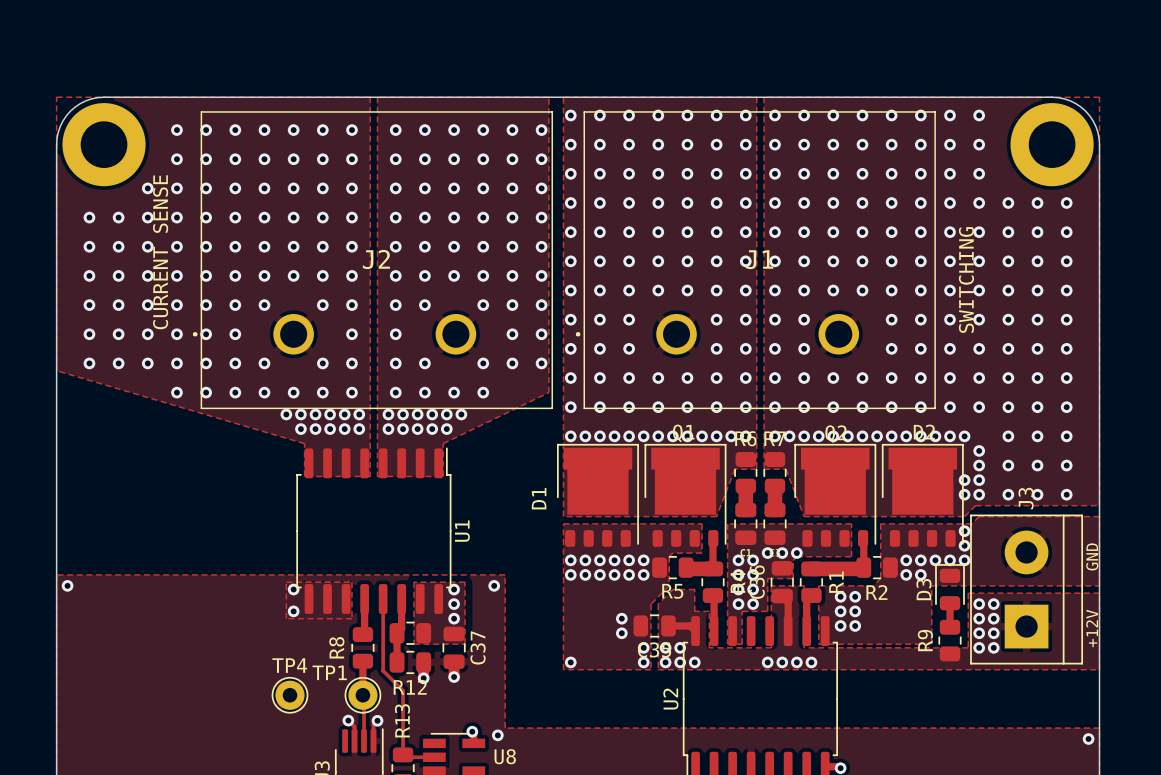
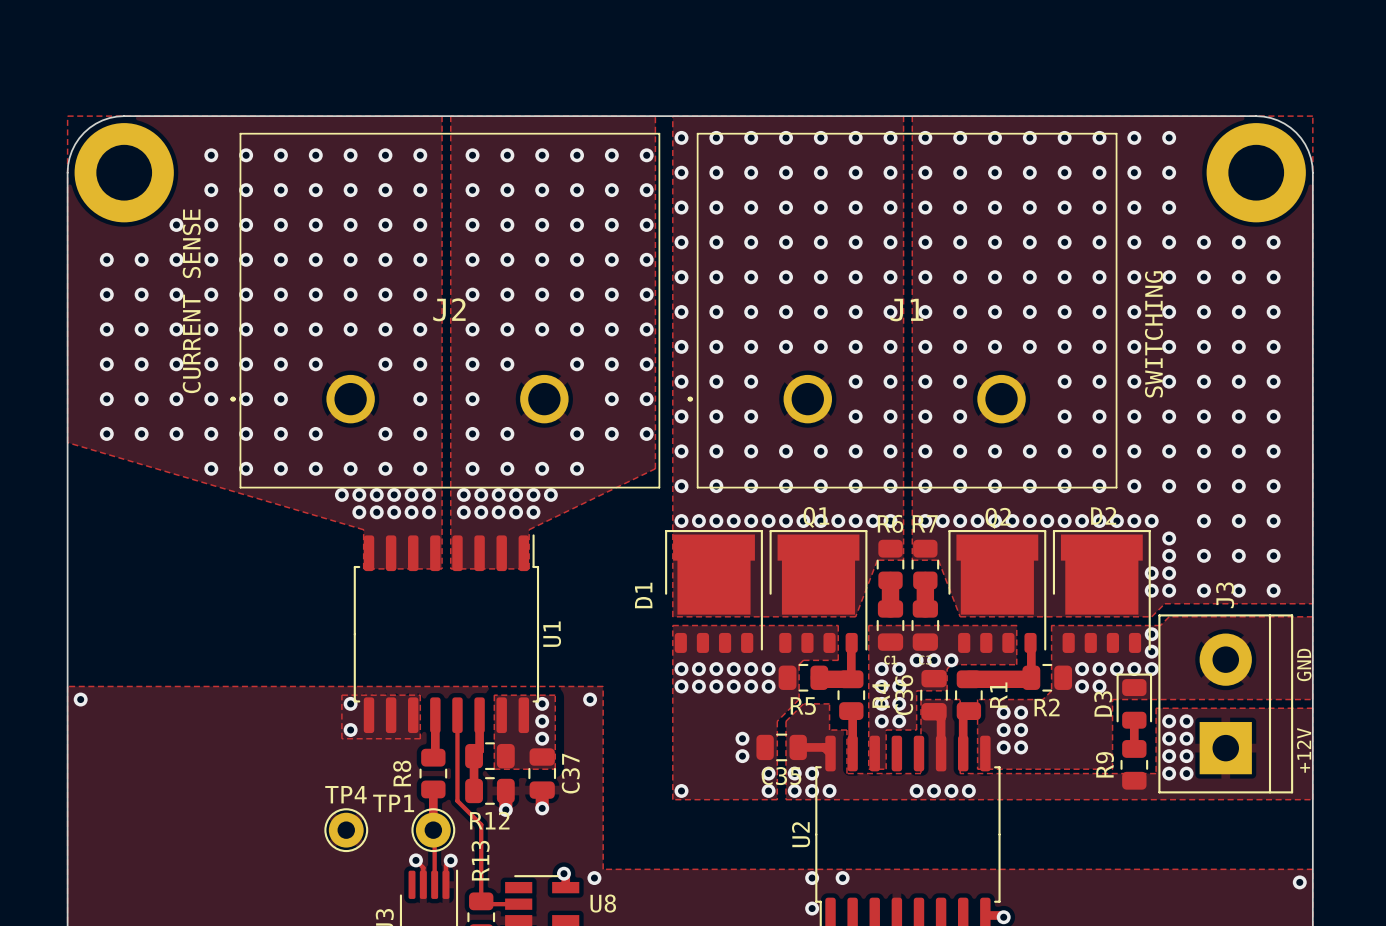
via: none -> (812, 878)
via: none -> (842, 878)
via: none -> (812, 908)

